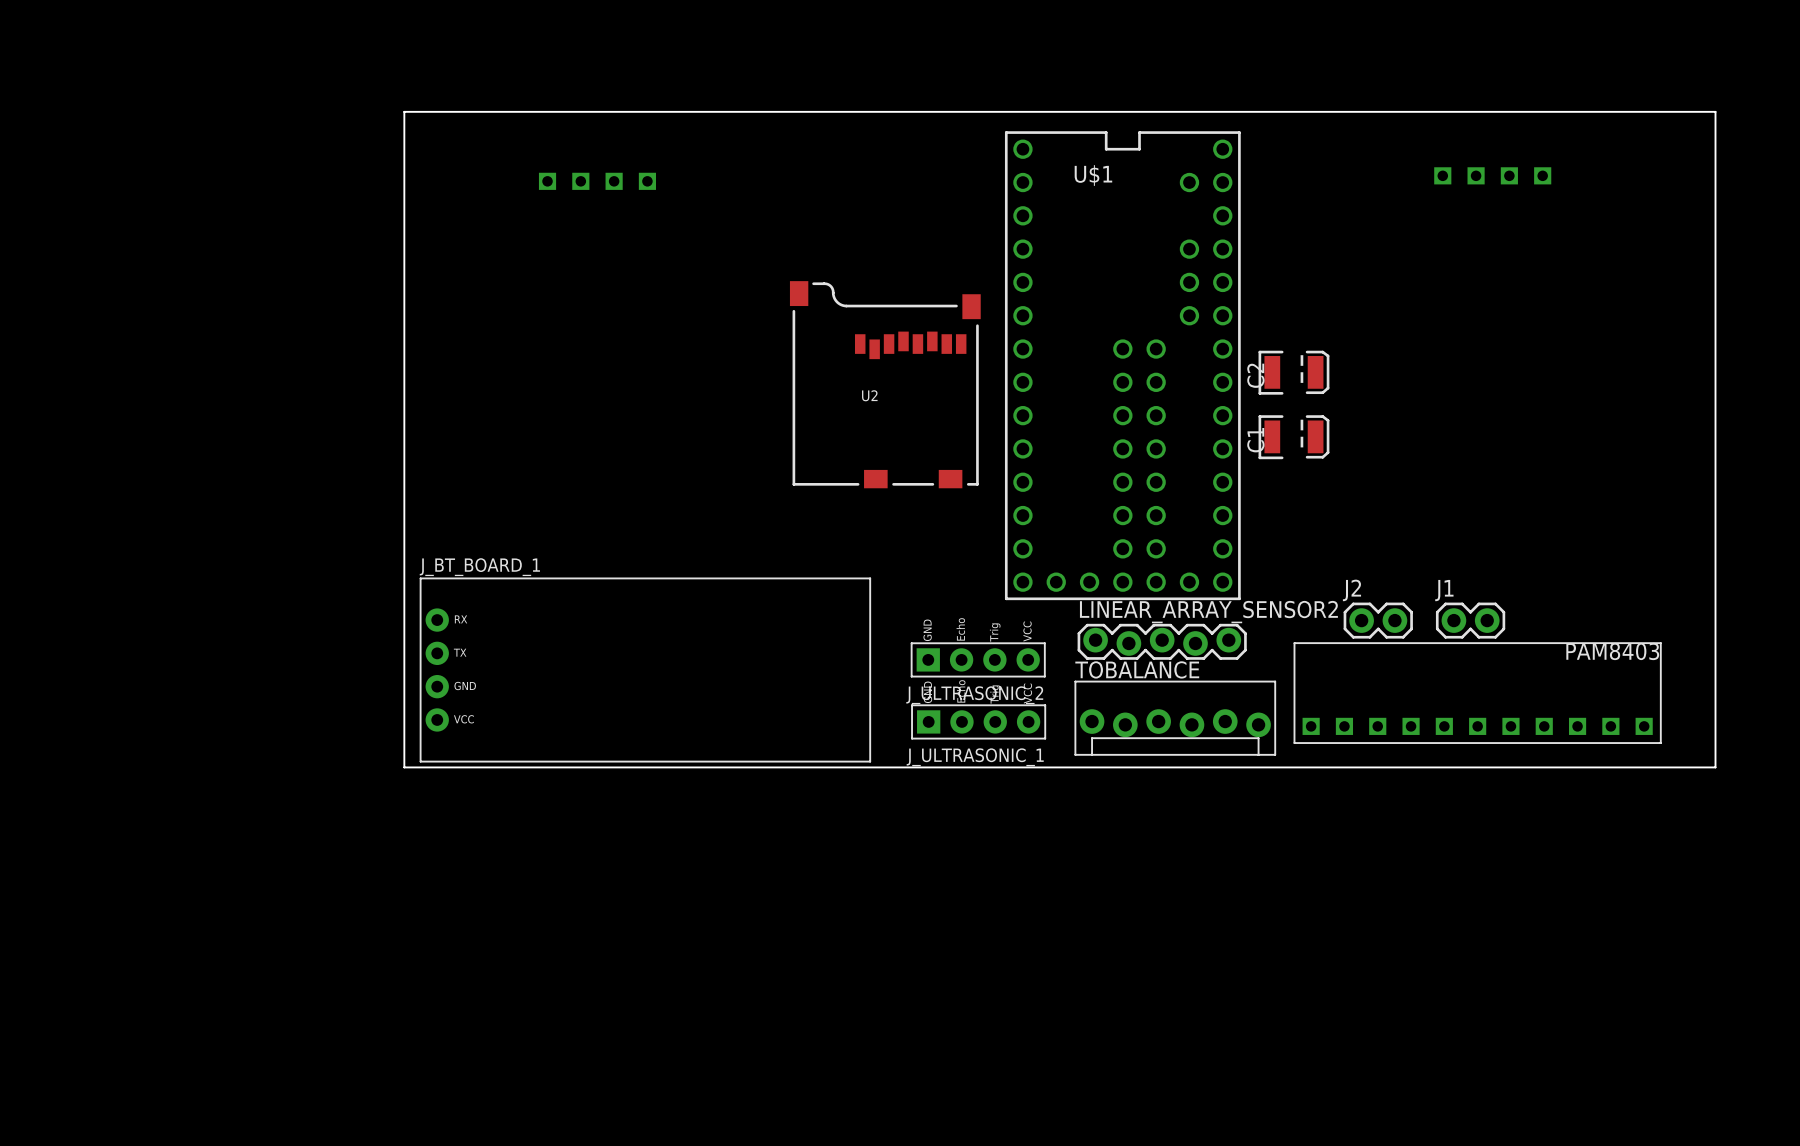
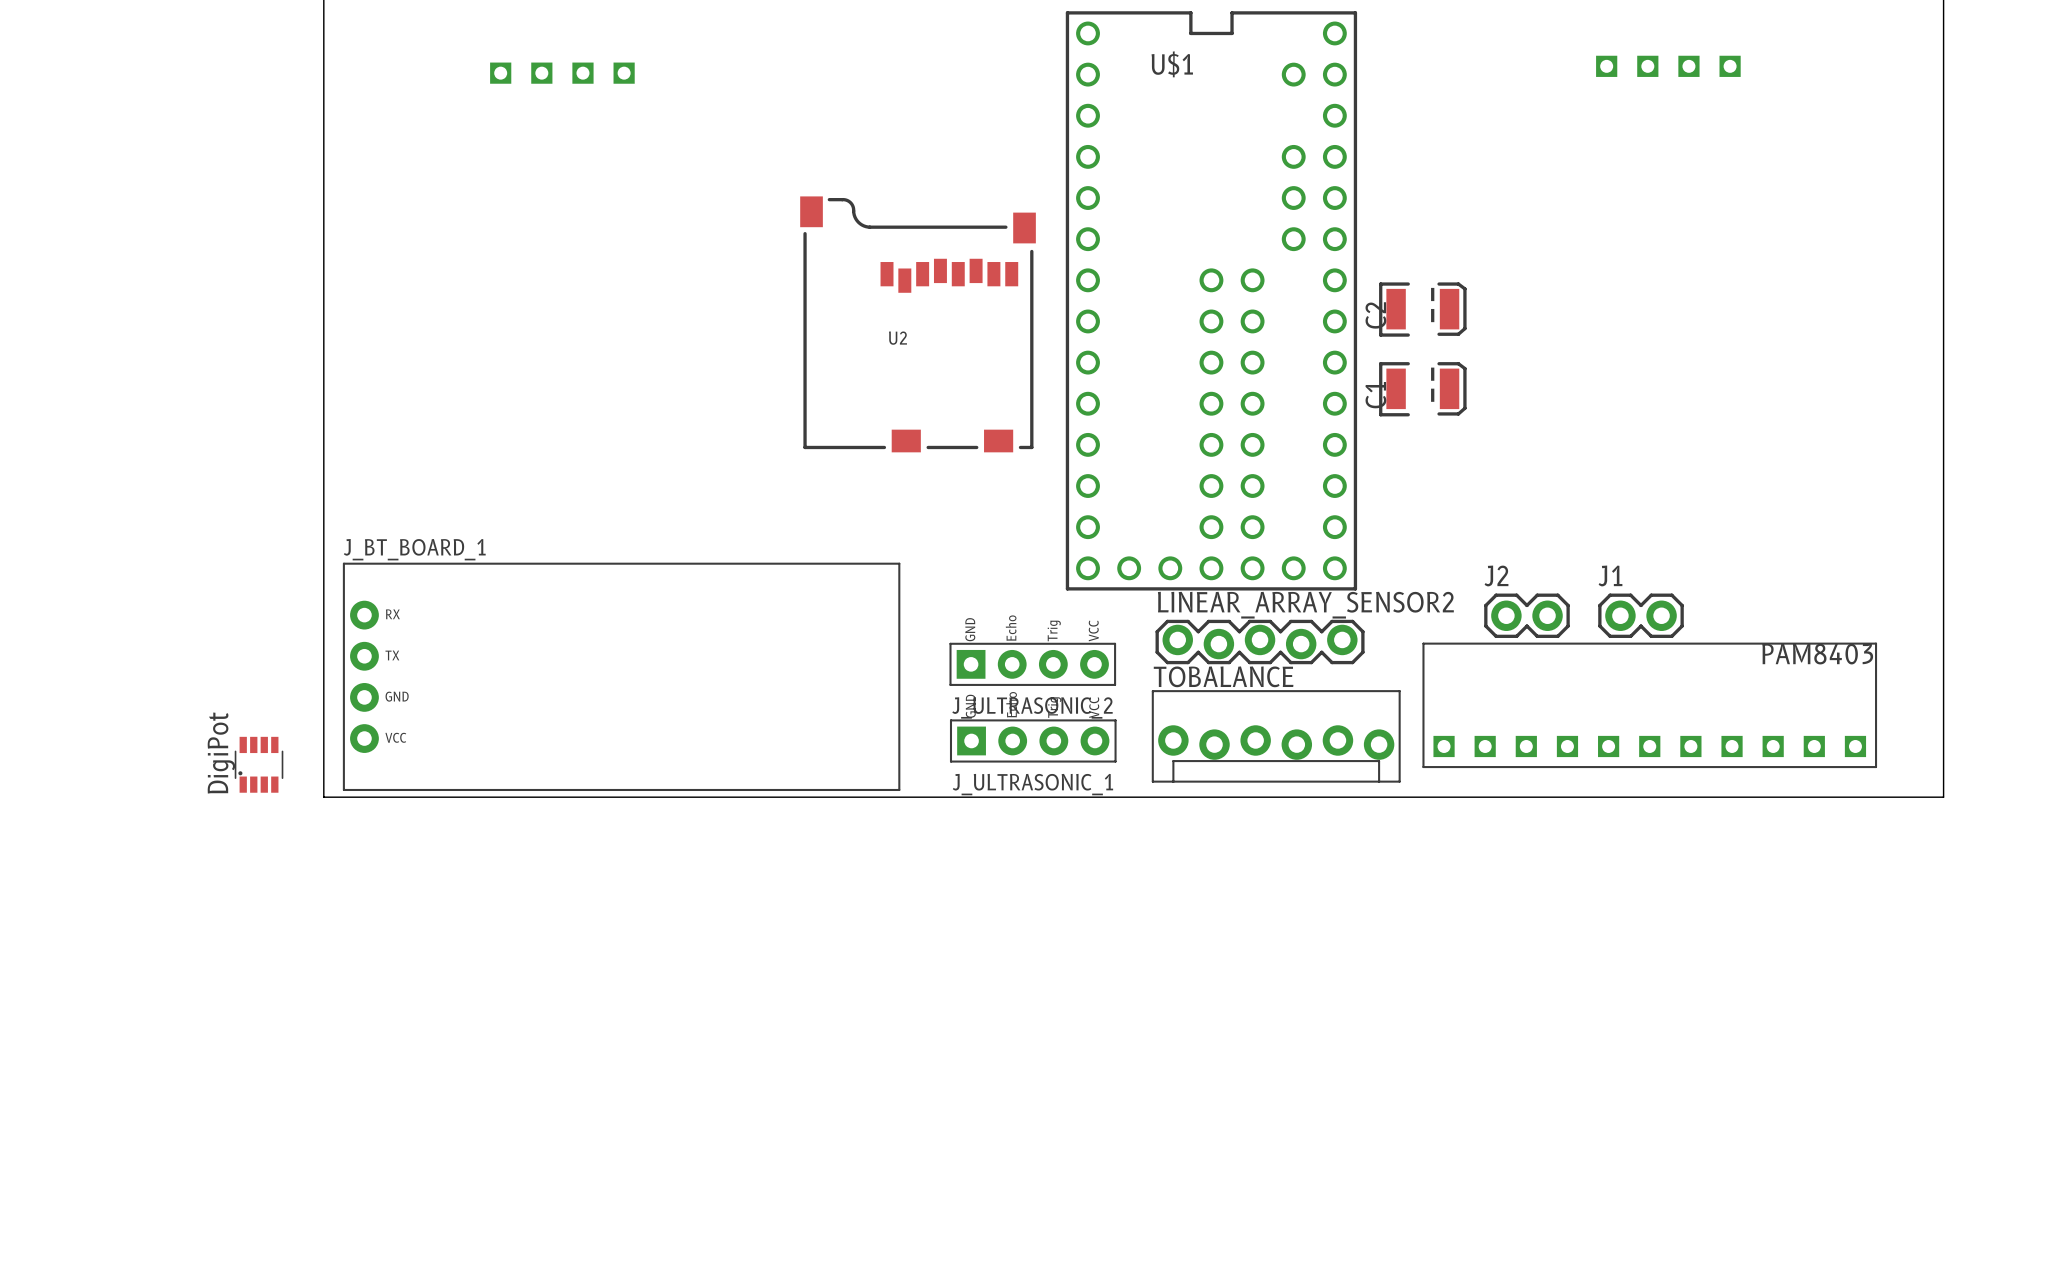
part: none -> (259, 764)

